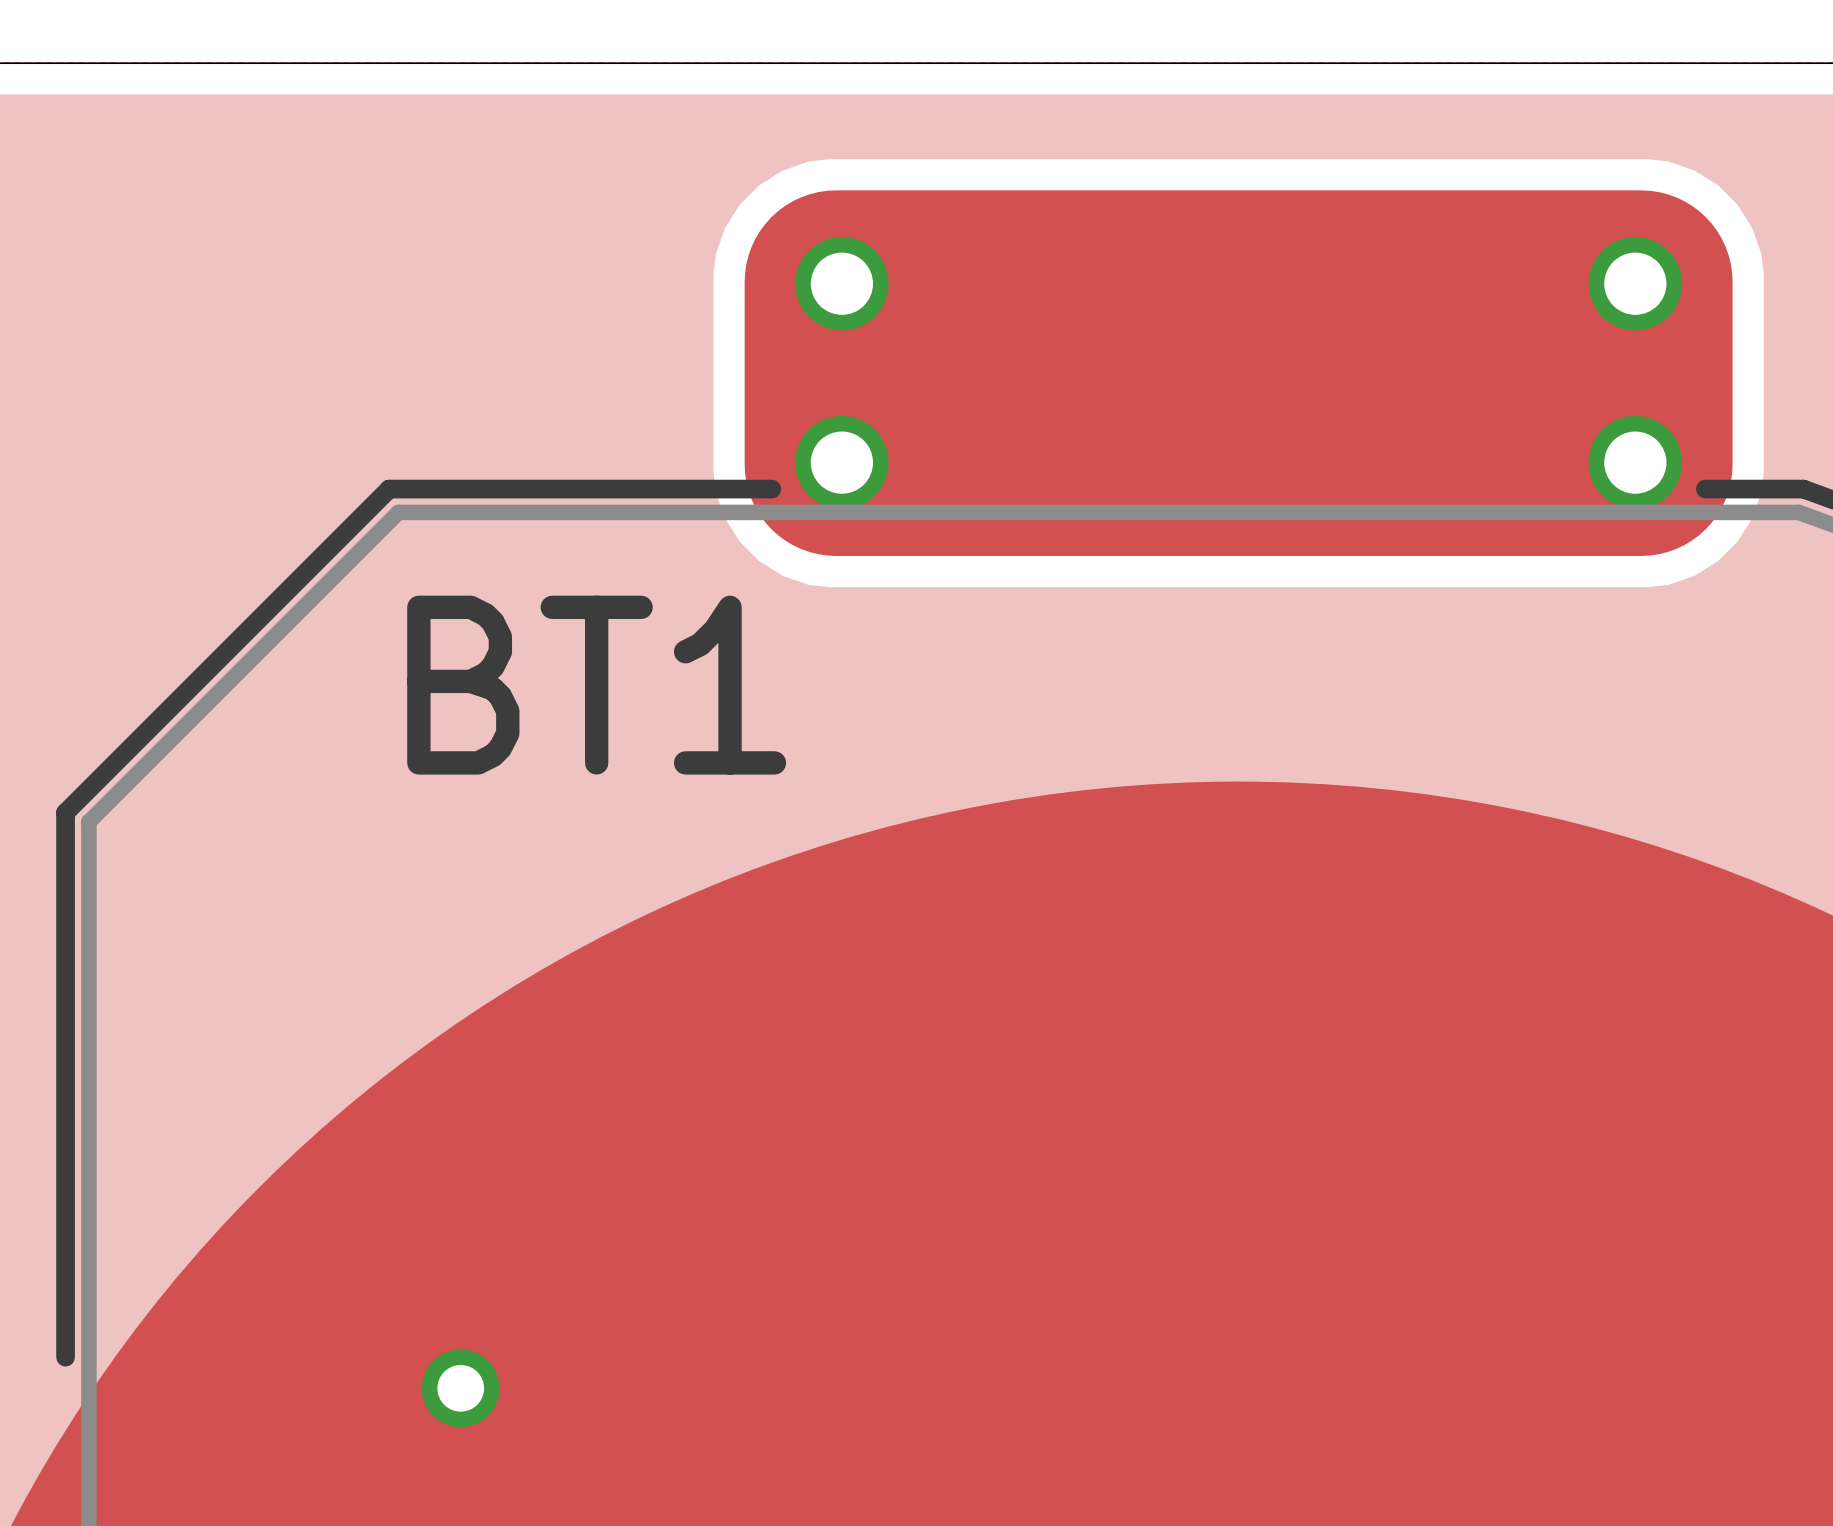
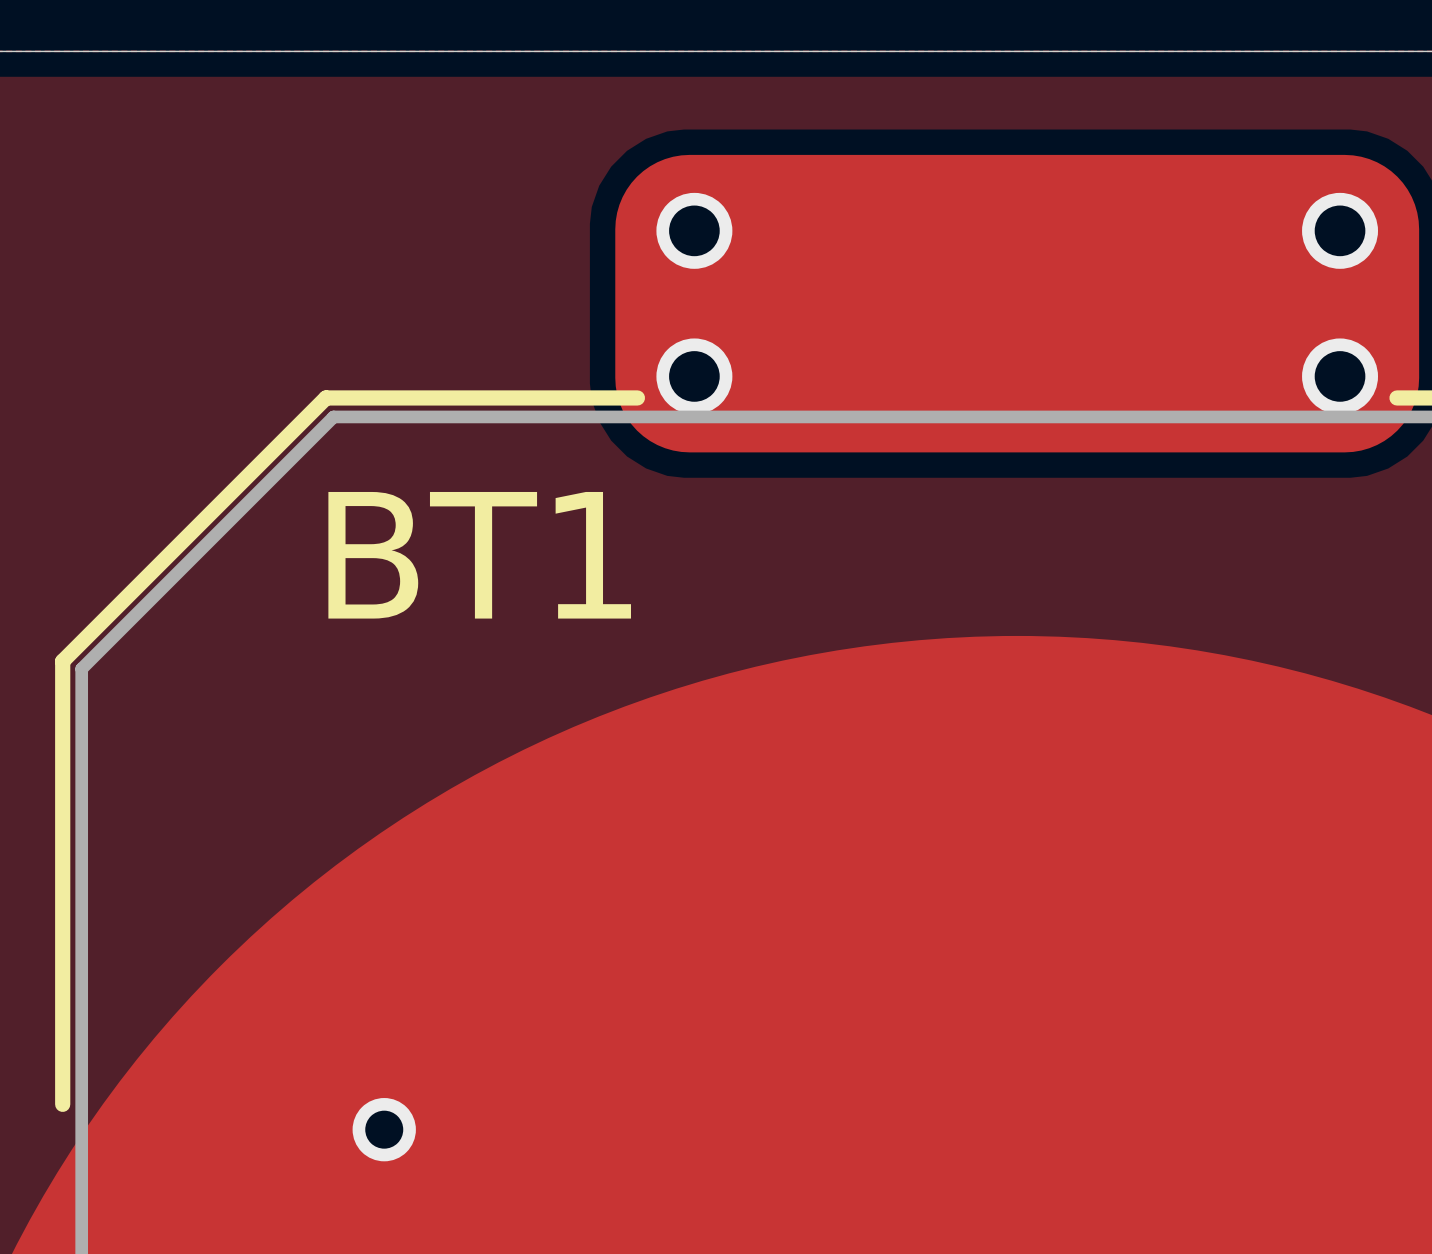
BT1 name position: BT1 (596, 685) -> BT1 (479, 555)

